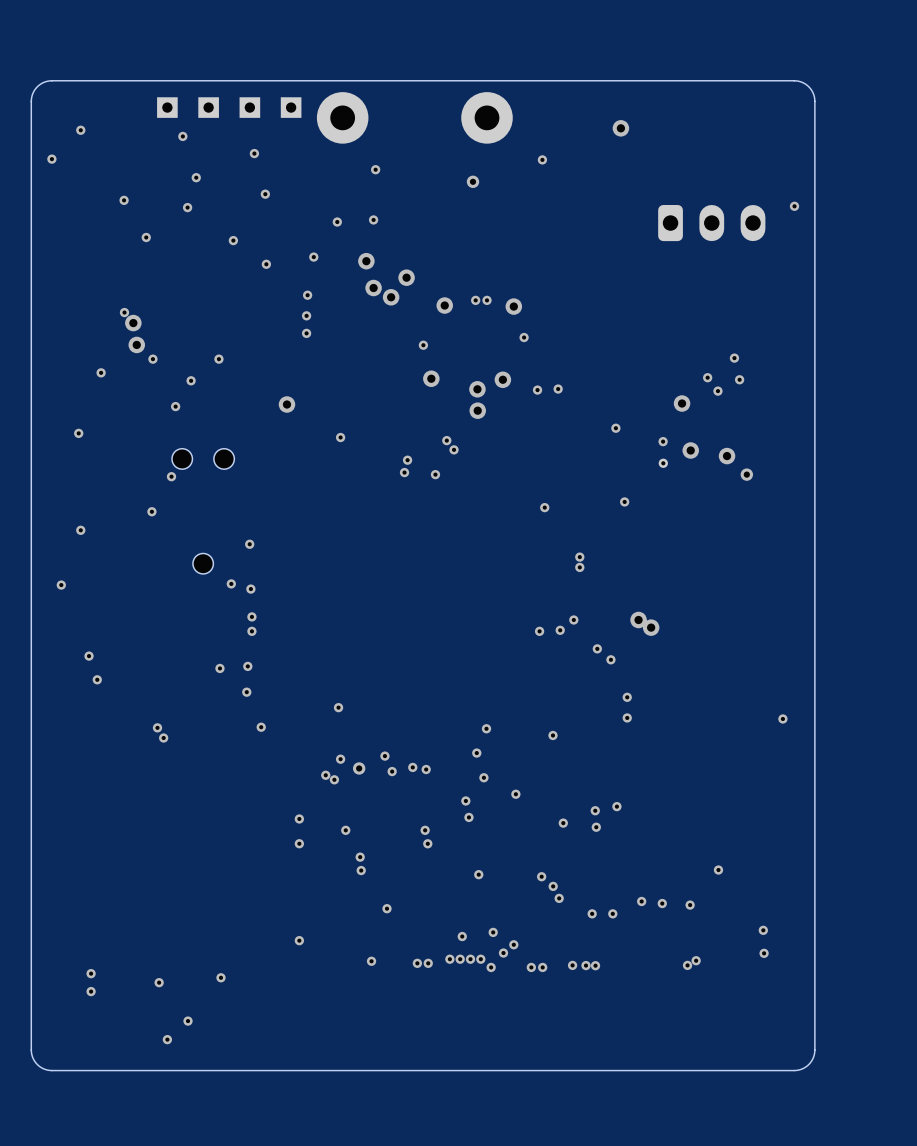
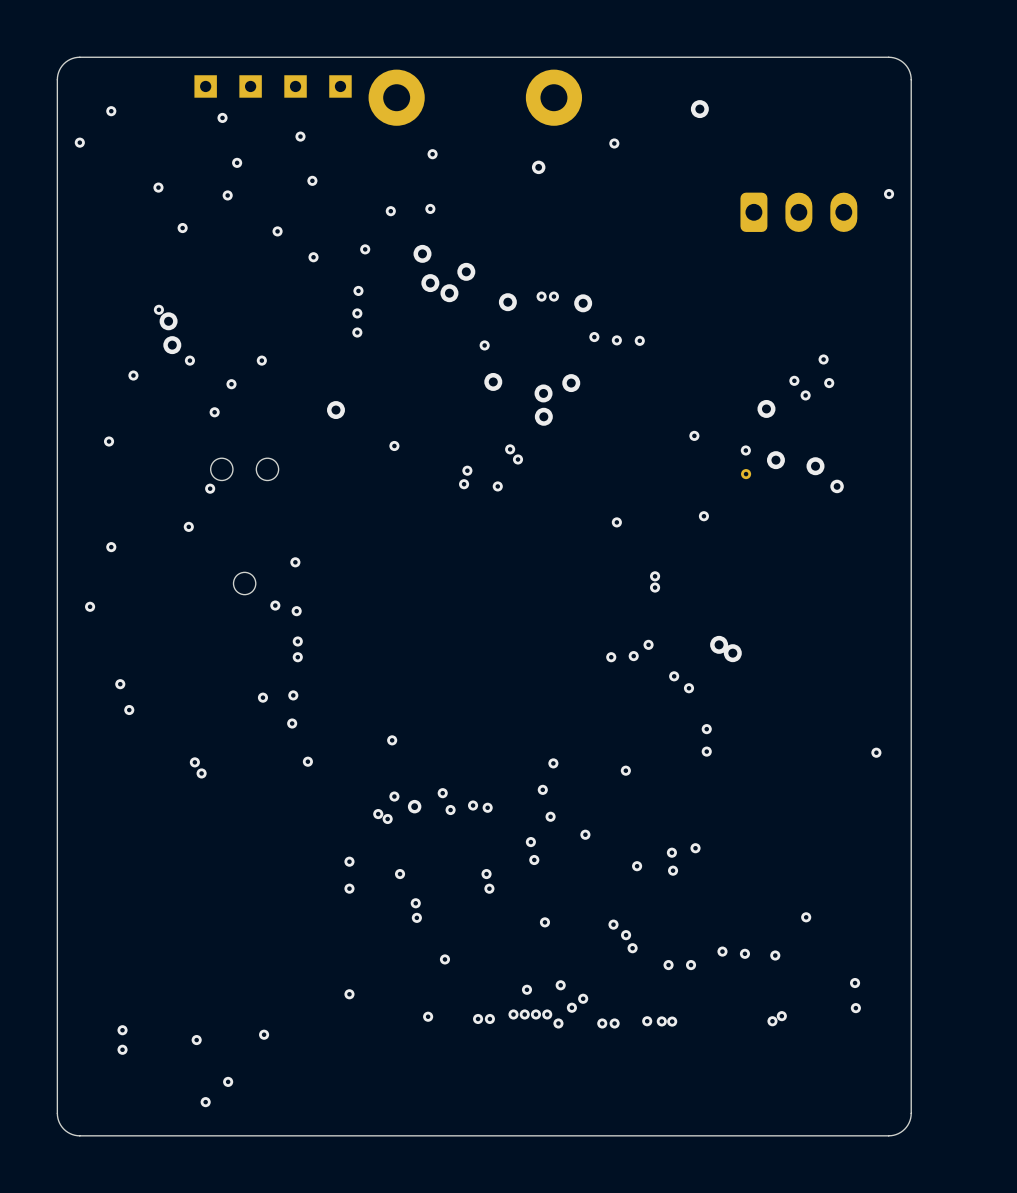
via: none -> (616, 340)
via: none -> (639, 340)
via: (558, 389) -> none
via: (537, 390) -> none

